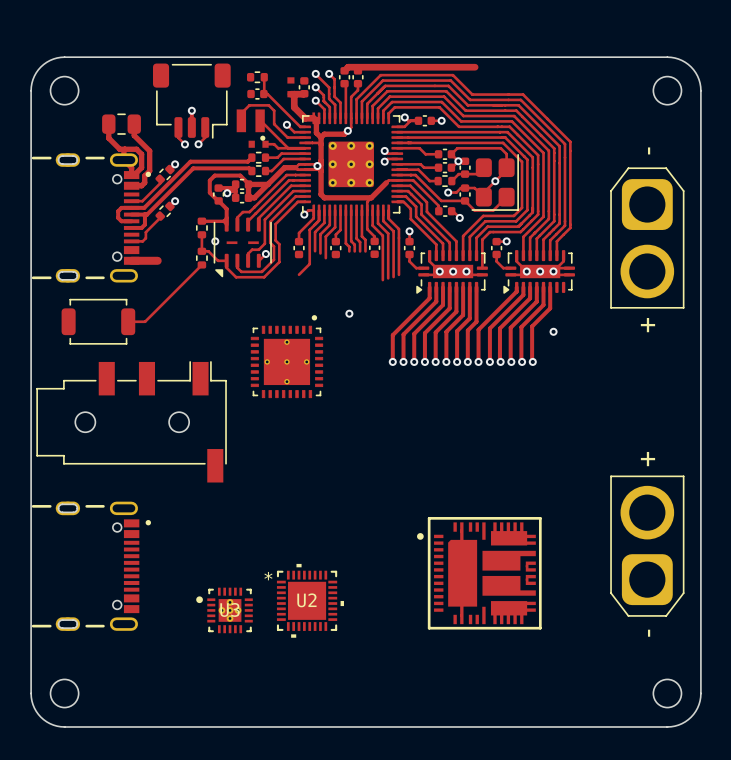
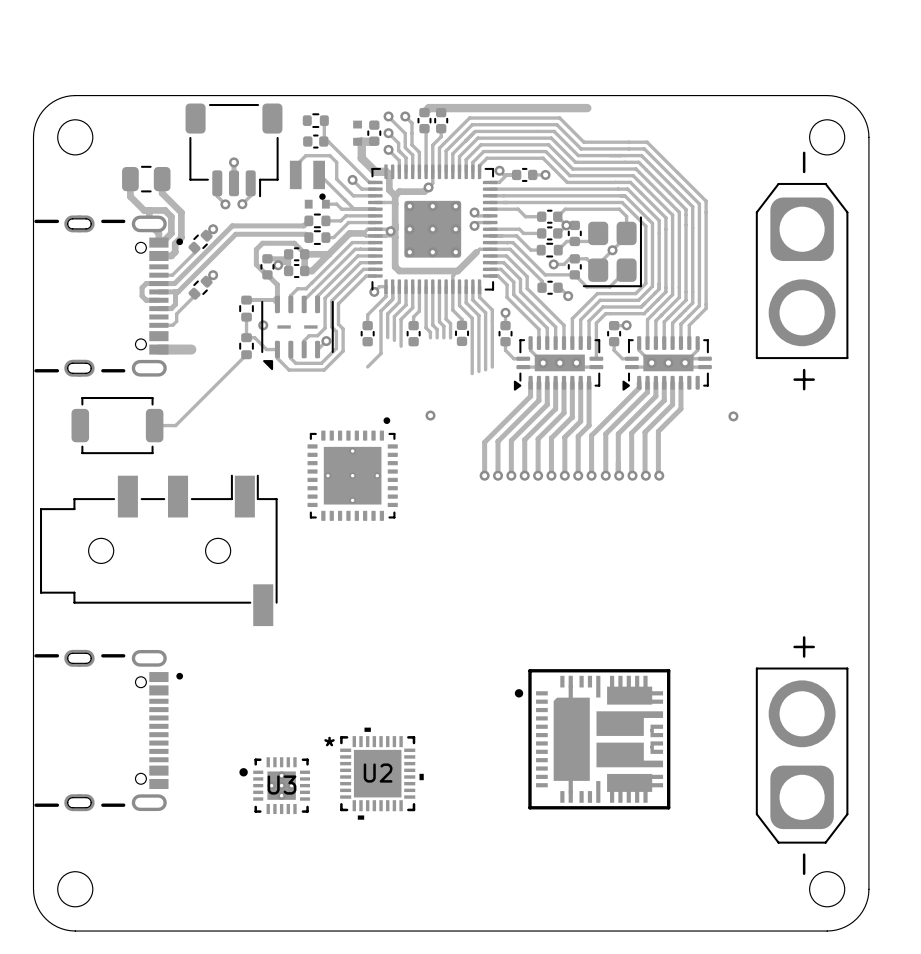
part position: (647, 238) -> (802, 271)
via position: (553, 331) -> (733, 416)
part position: (647, 546) -> (802, 755)

